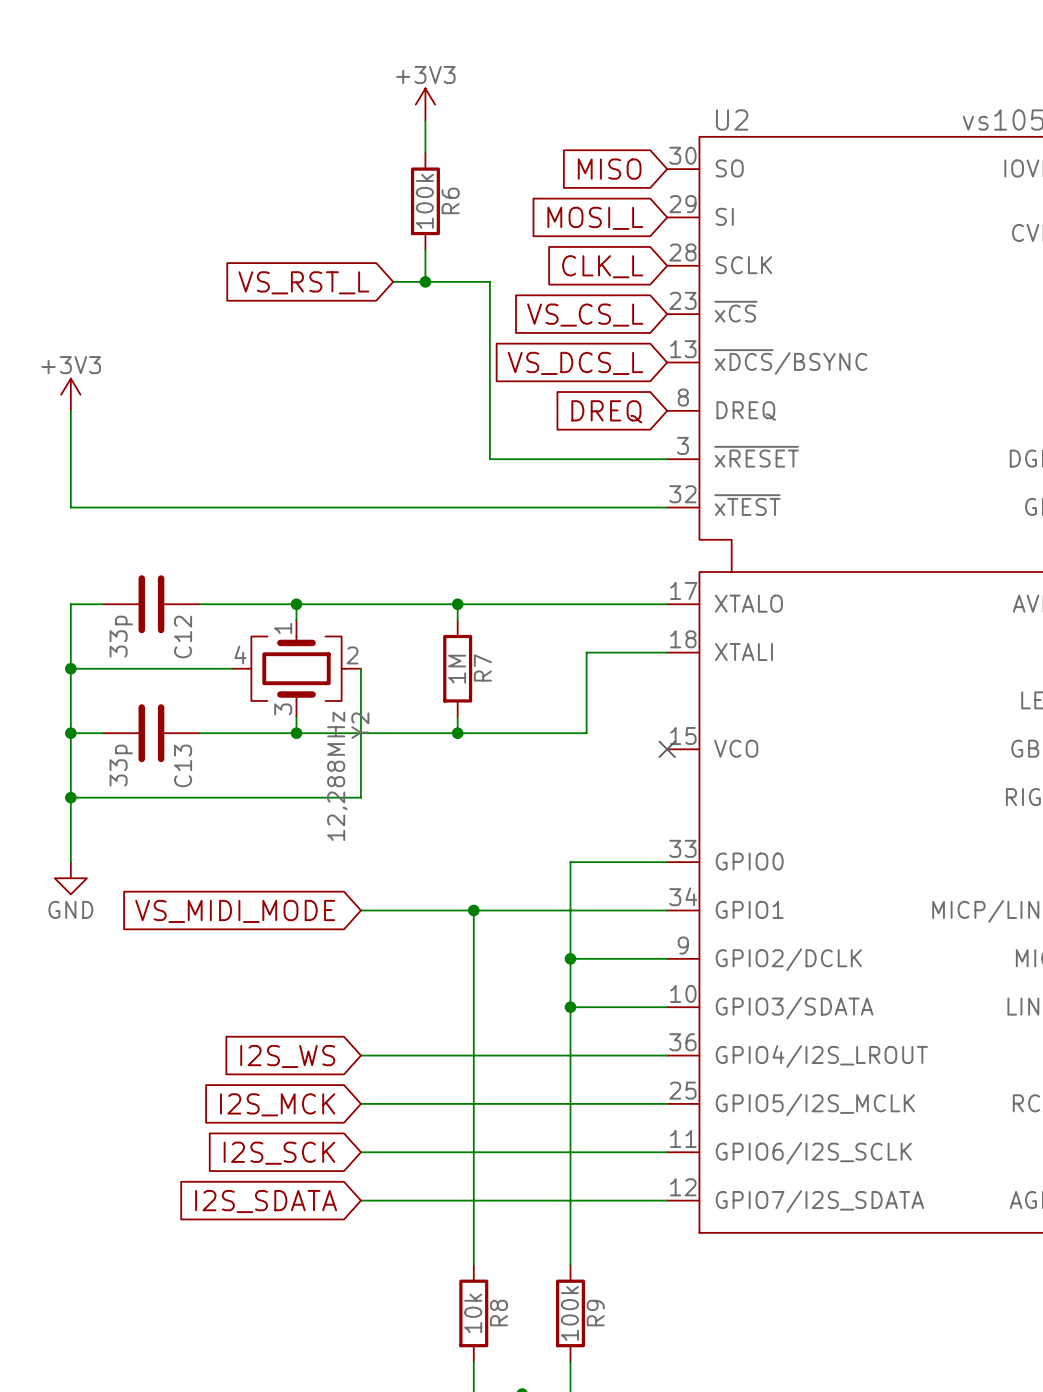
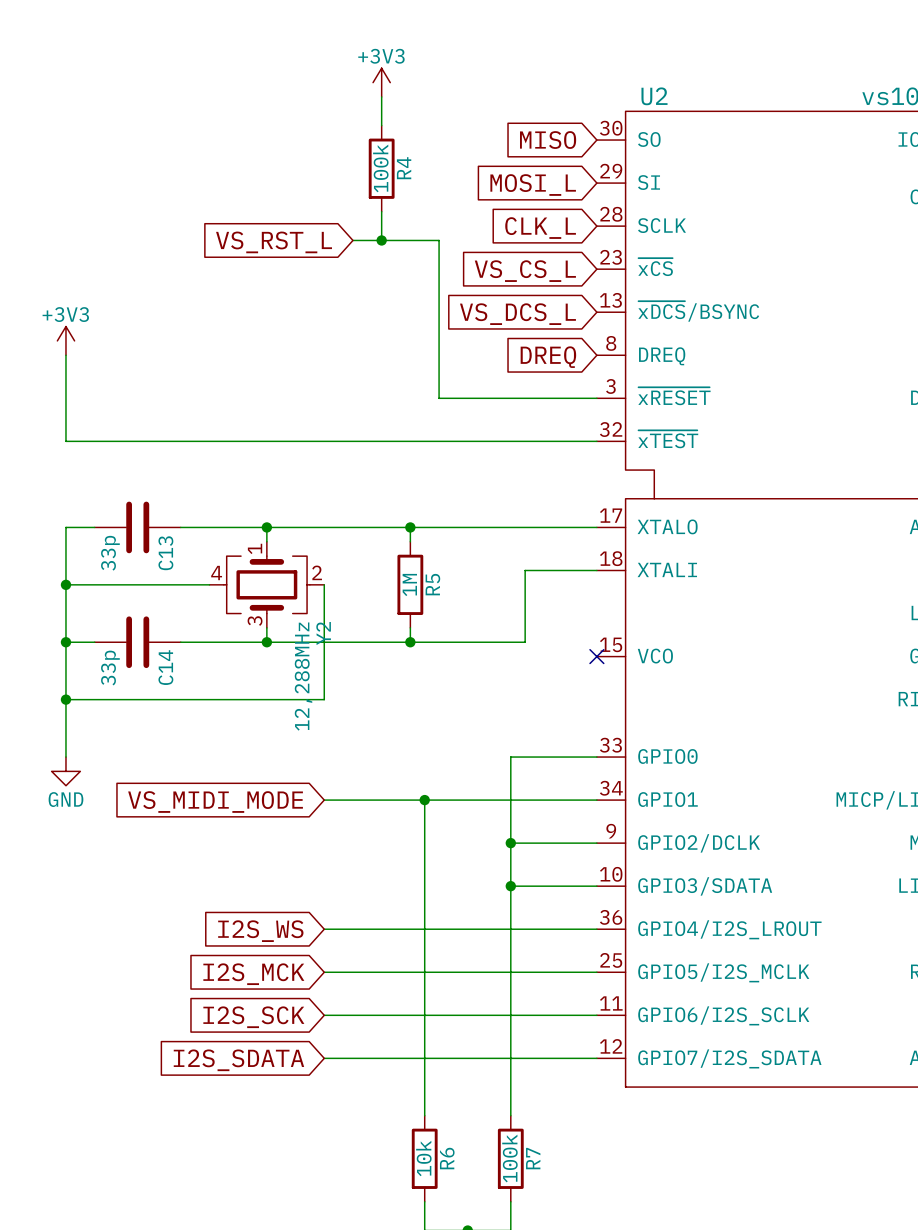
R6 name: R6 (450, 200) -> R4 (404, 168)
C12 name: C12 (183, 637) -> C13 (165, 553)
R7 name: R7 (482, 667) -> R5 (432, 584)
C13 name: C13 (183, 765) -> C14 (165, 667)
R8 name: R8 (498, 1313) -> R6 (447, 1158)
R9 name: R9 (595, 1313) -> R7 (533, 1158)

